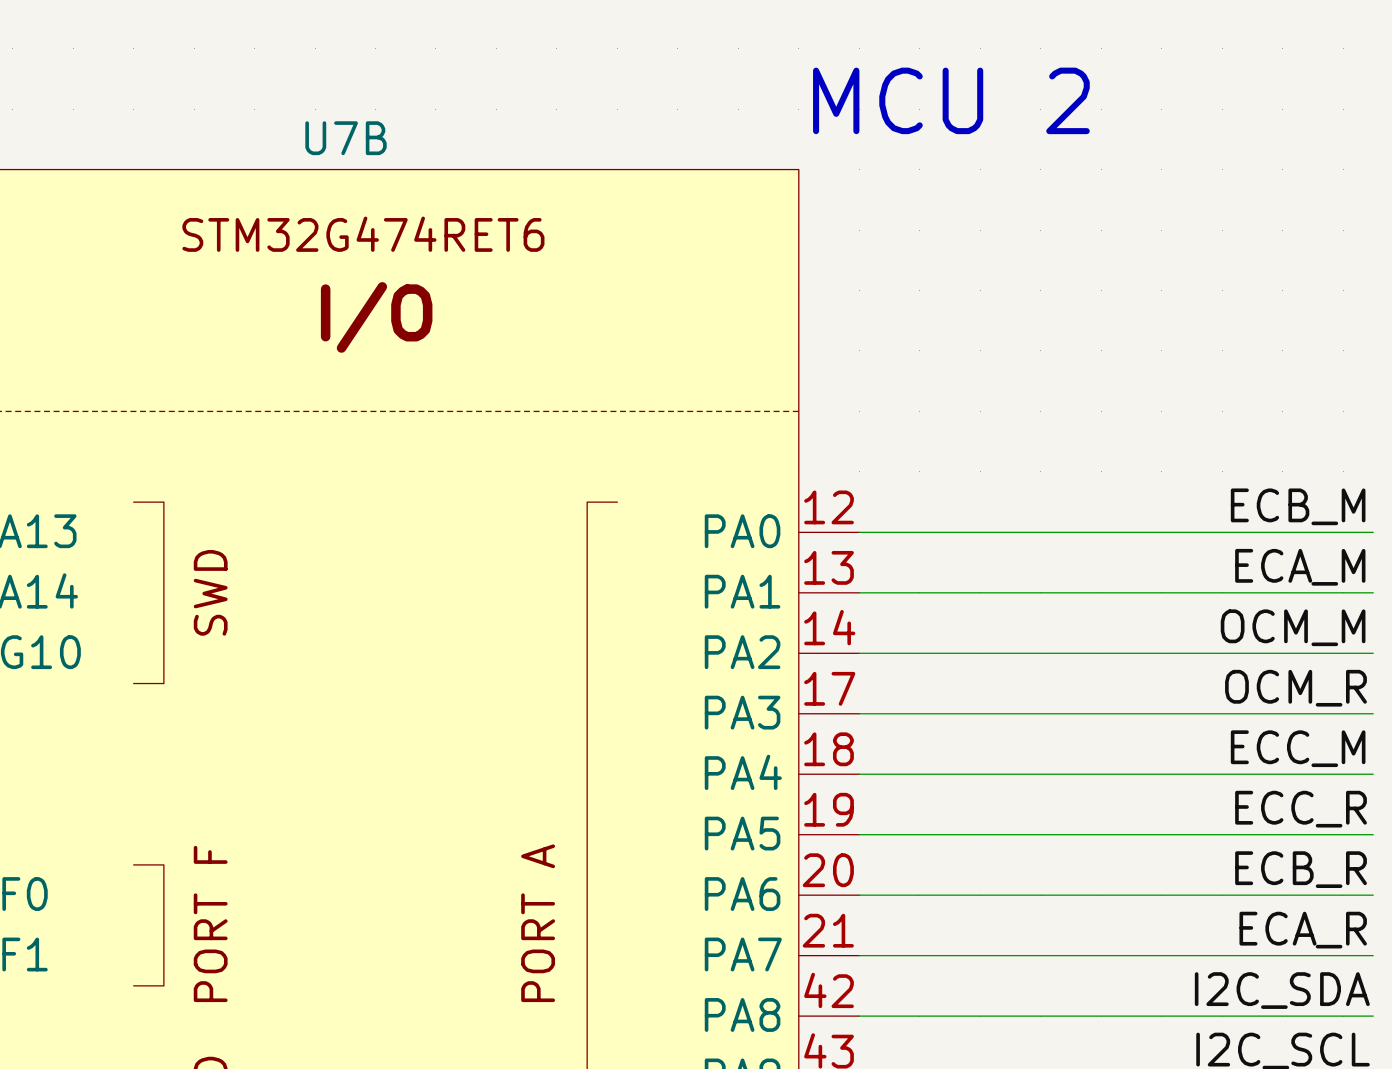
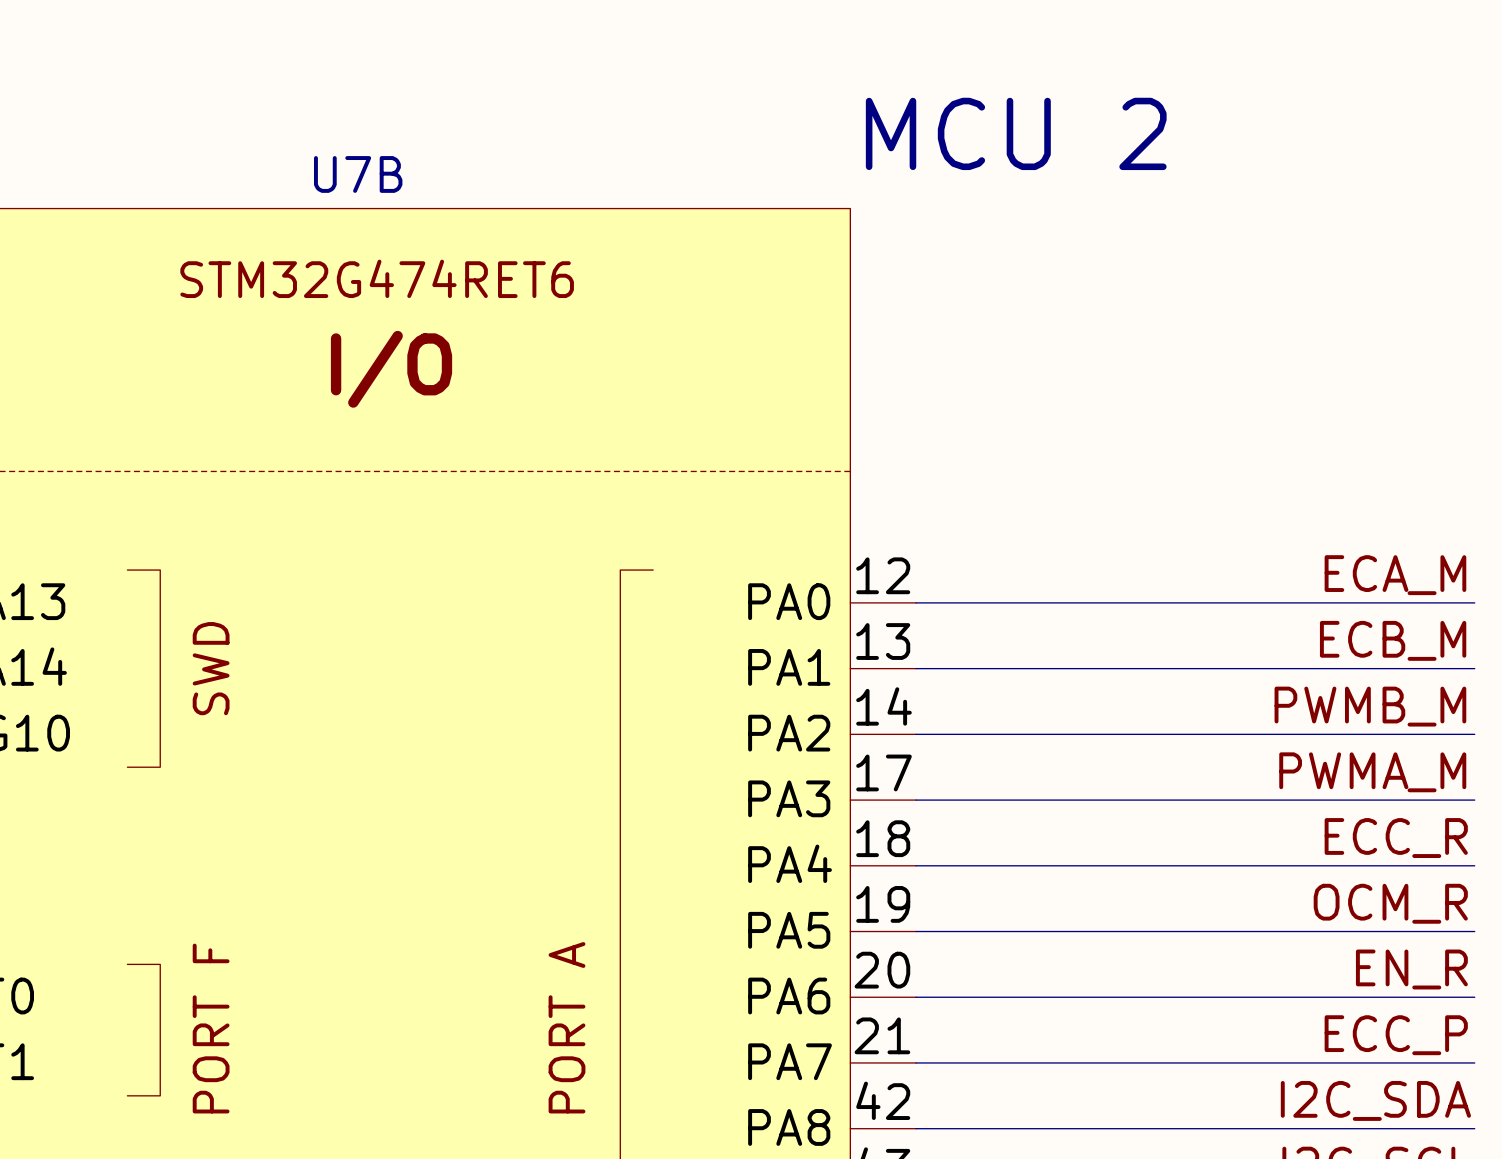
label: ECB_M (1298, 506) -> ECA_M (1395, 575)
label: ECA_M (1300, 567) -> ECB_M (1393, 640)
label: OCM_M (1293, 627) -> PWMB_M (1370, 706)
label: OCM_R (1295, 688) -> PWMA_M (1372, 772)
label: ECC_M (1298, 748) -> ECC_R (1396, 838)
label: ECC_R (1301, 809) -> OCM_R (1390, 903)
label: ECB_R (1301, 869) -> EN_R (1411, 969)
label: ECA_R (1303, 930) -> ECC_P (1396, 1035)

